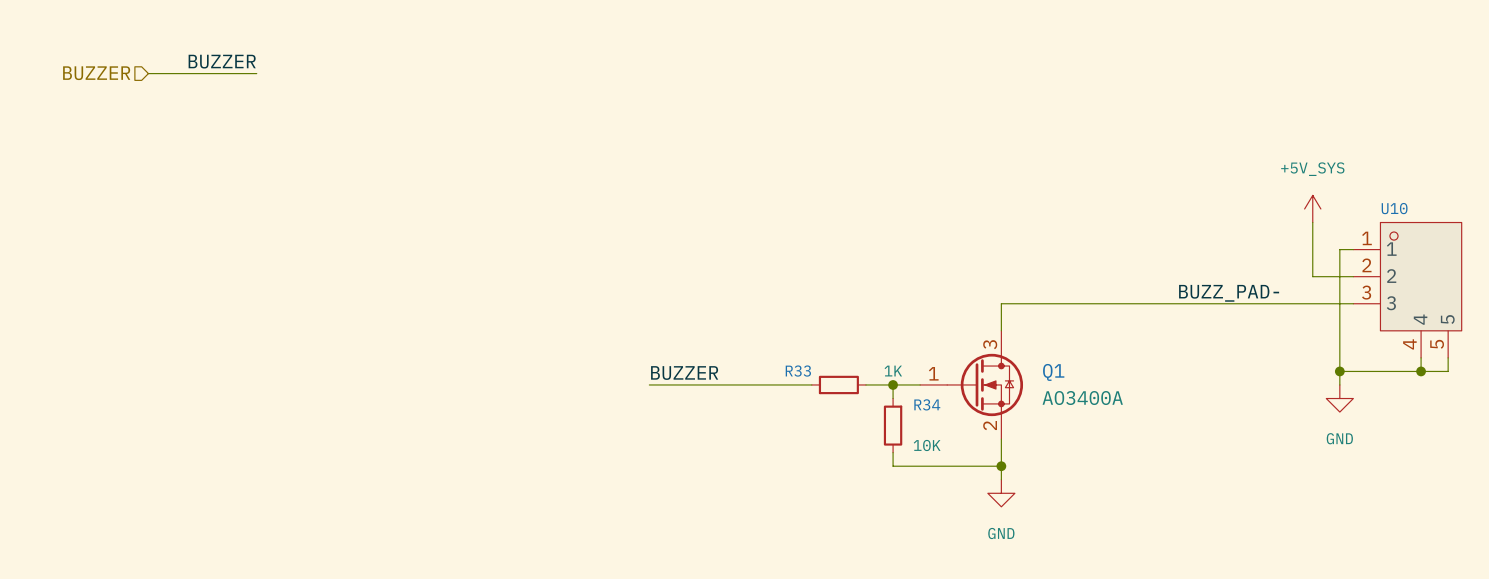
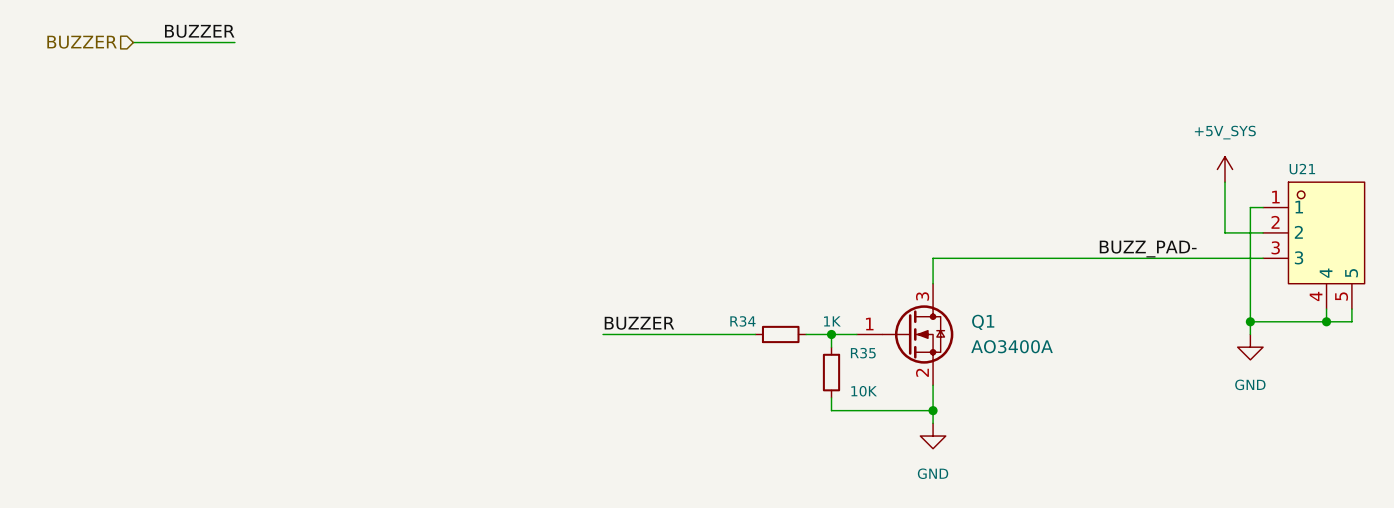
U10 name: U10 (1394, 208) -> U21 (1302, 169)
R33 name: R33 (798, 371) -> R34 (742, 321)
R34 name: R34 (927, 404) -> R35 (863, 353)

